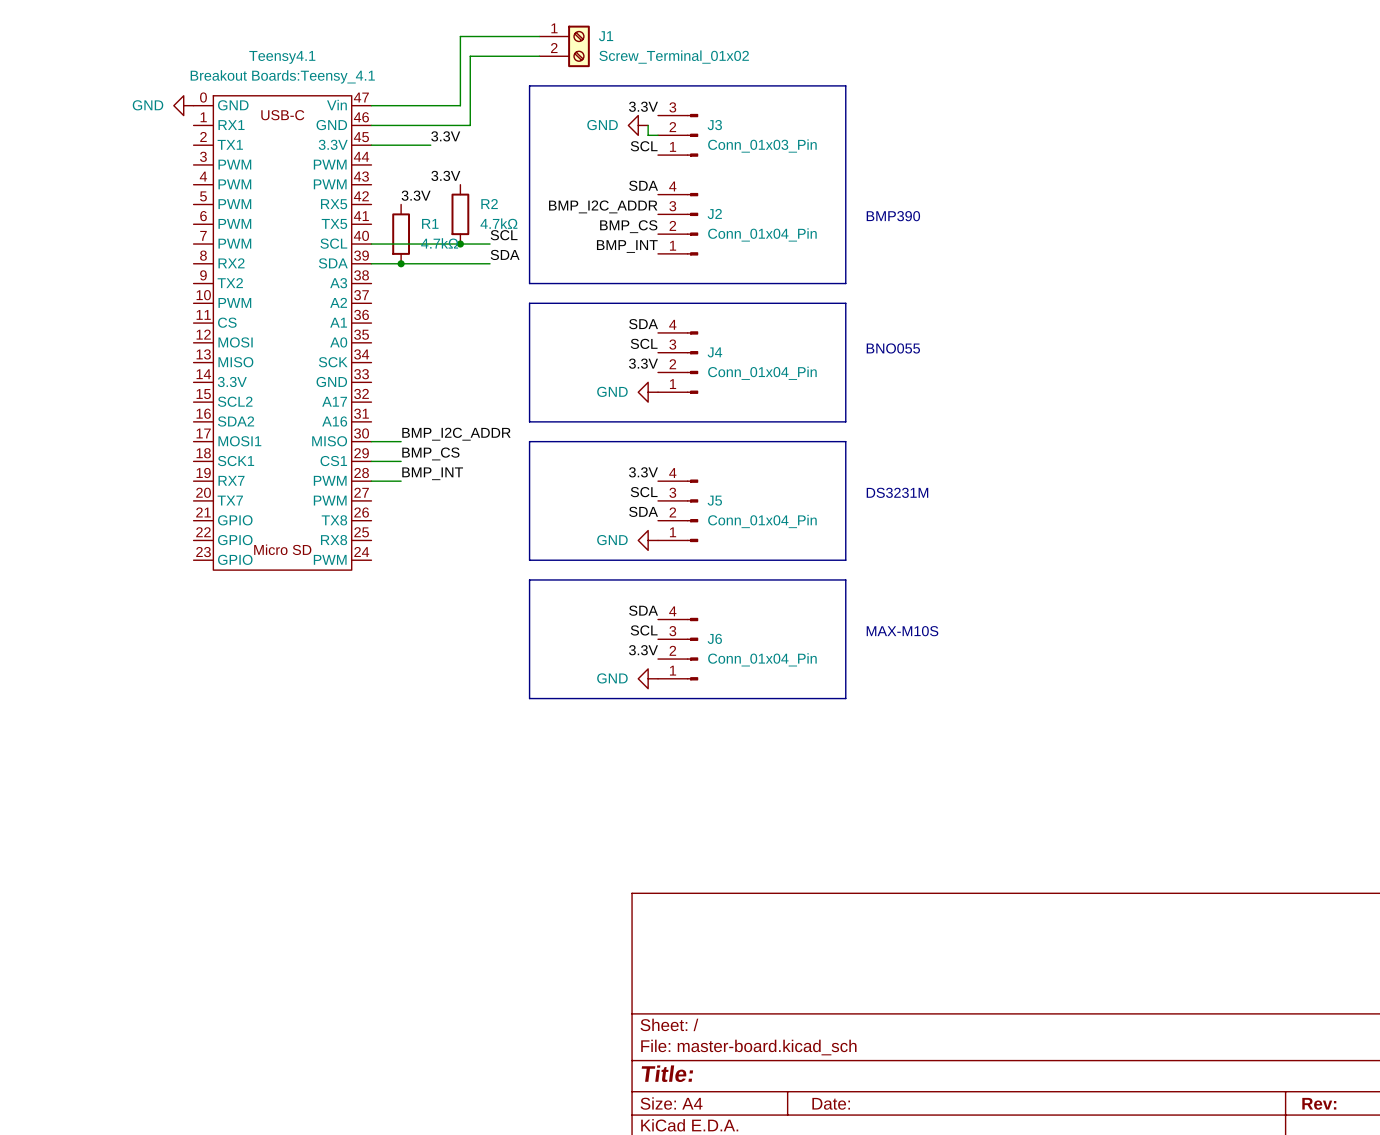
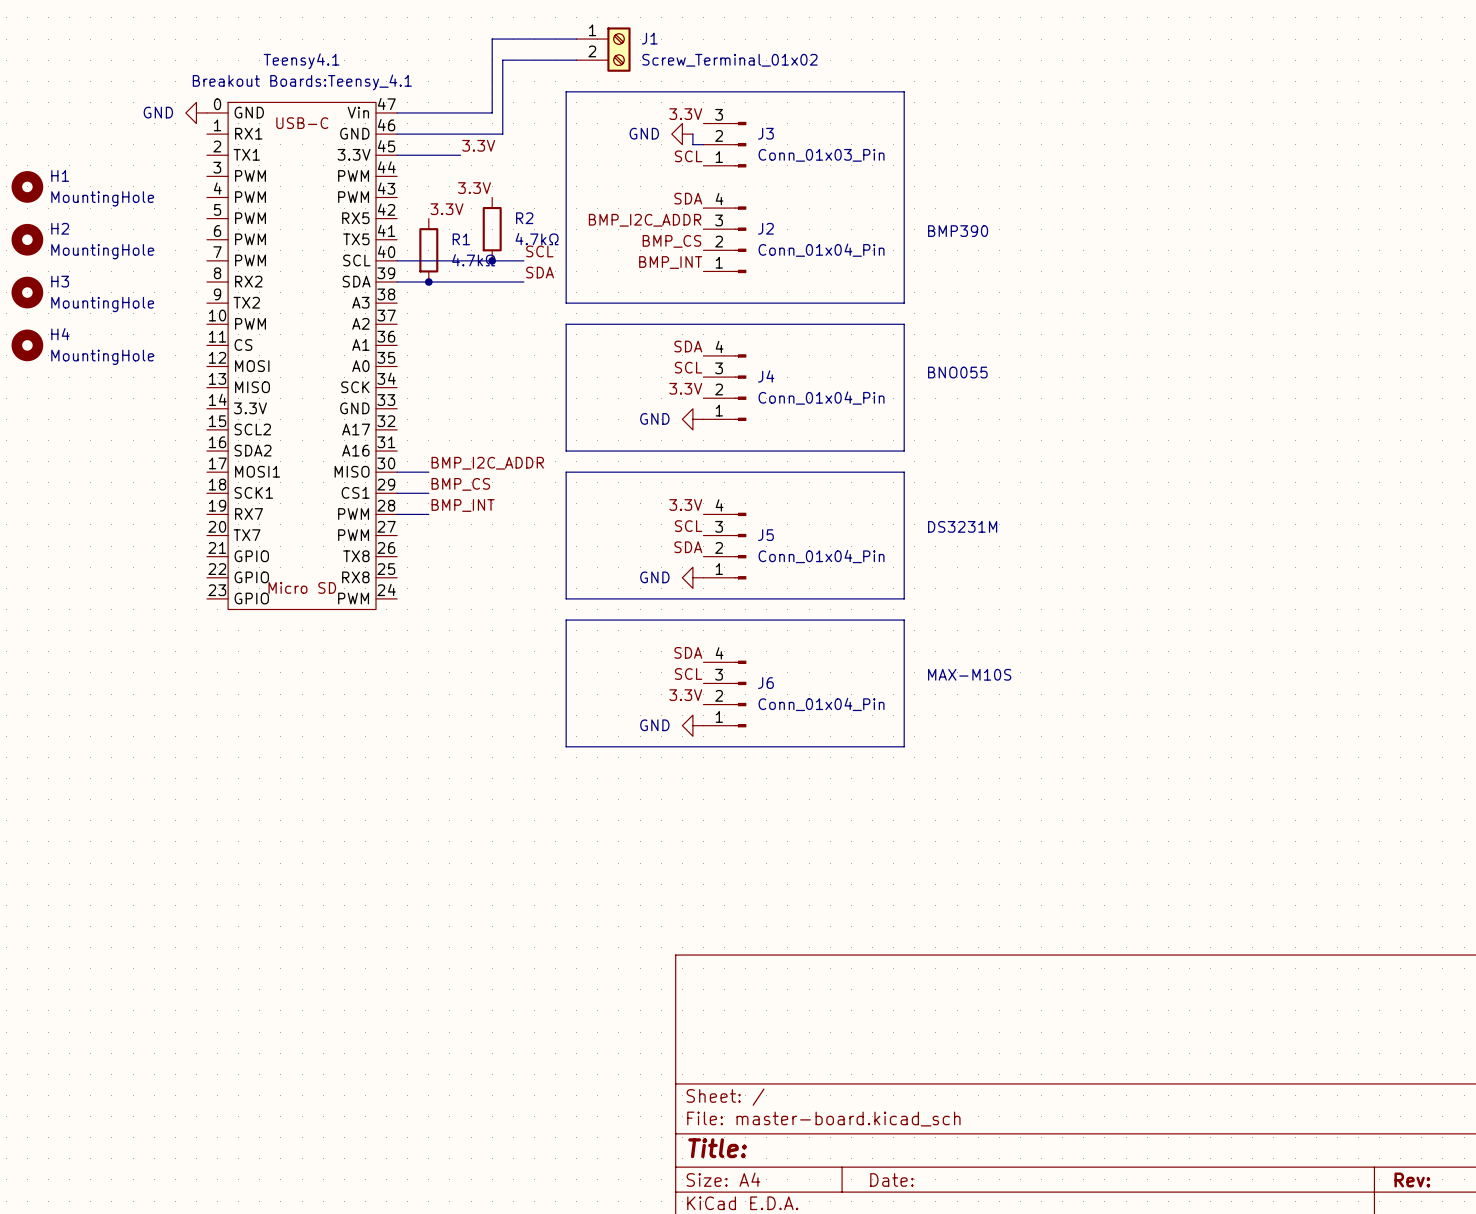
H1: none -> MountingHole (27, 186)
H2: none -> MountingHole (27, 239)
H3: none -> MountingHole (27, 292)
H4: none -> MountingHole (27, 345)

